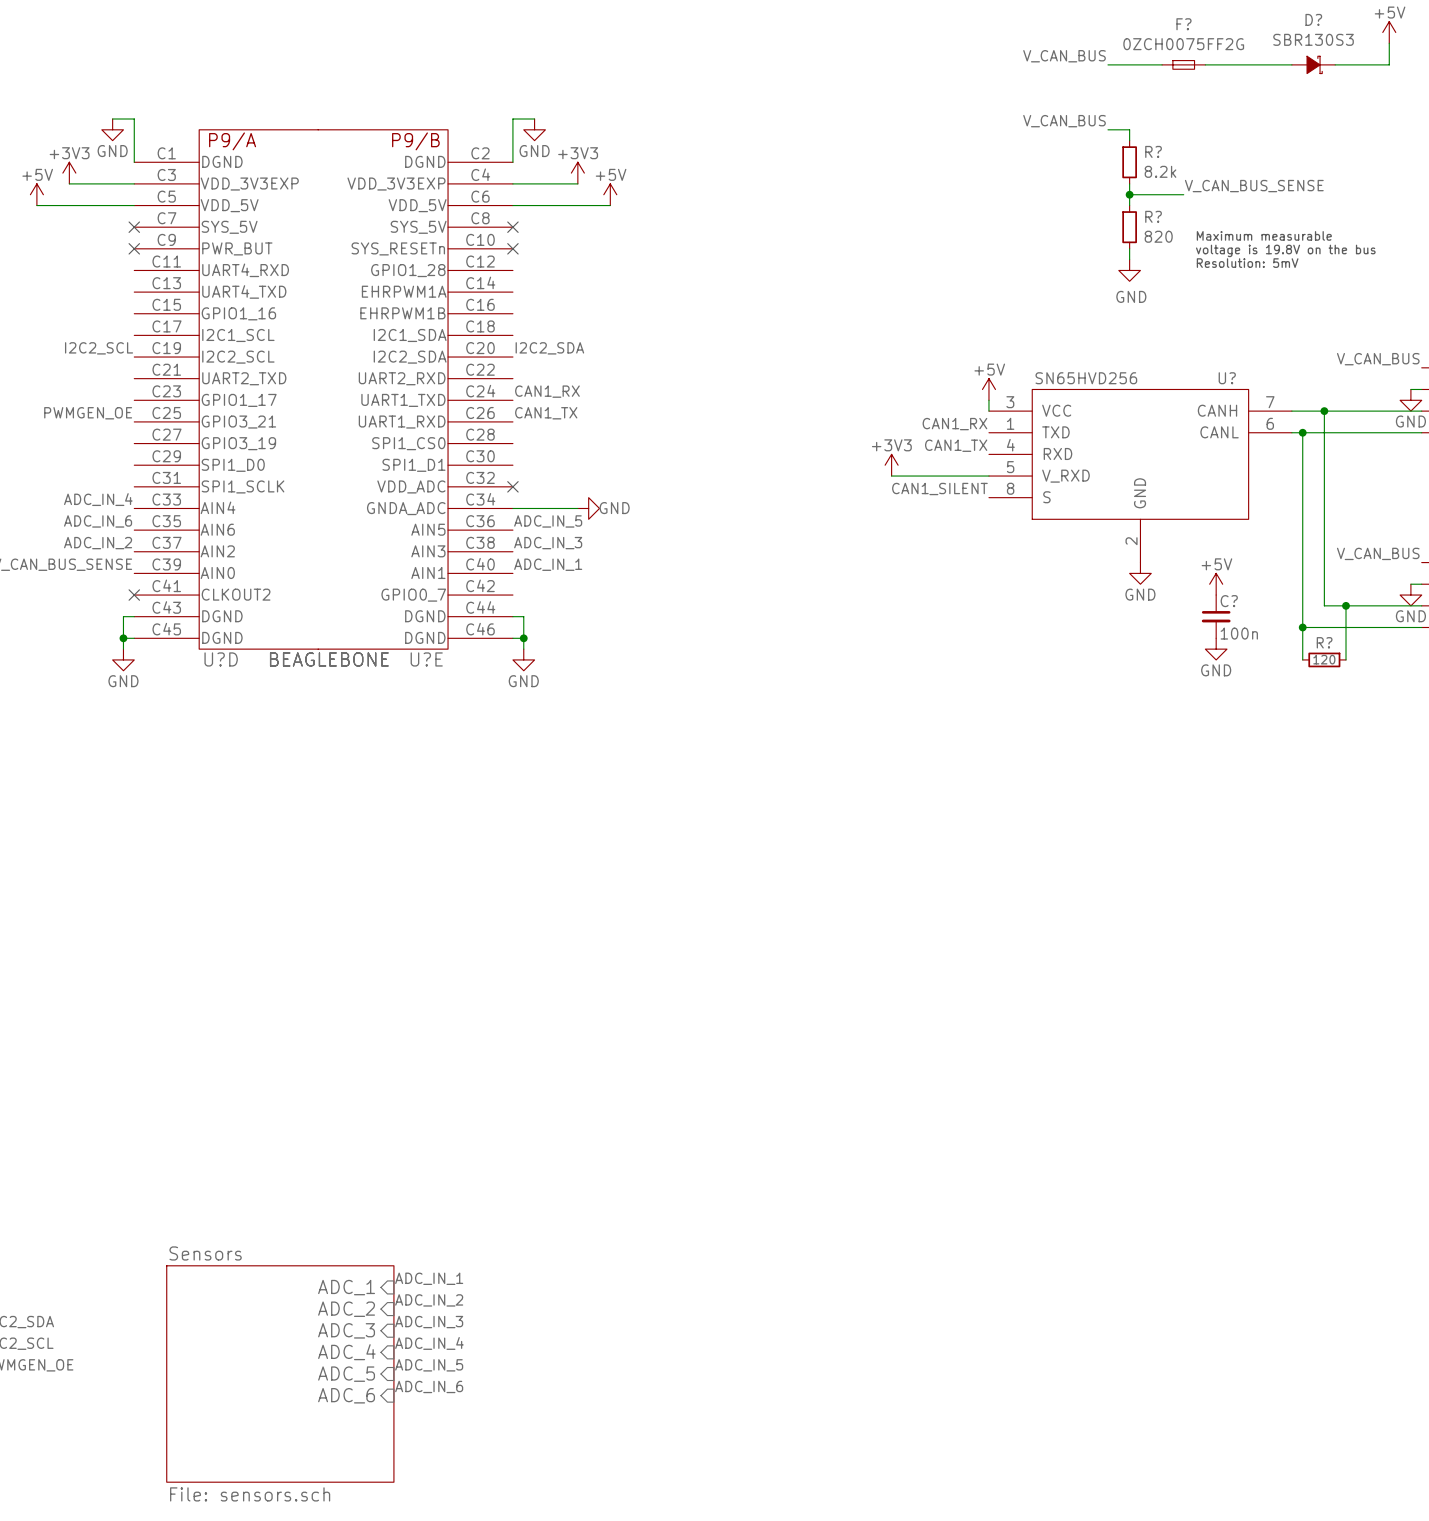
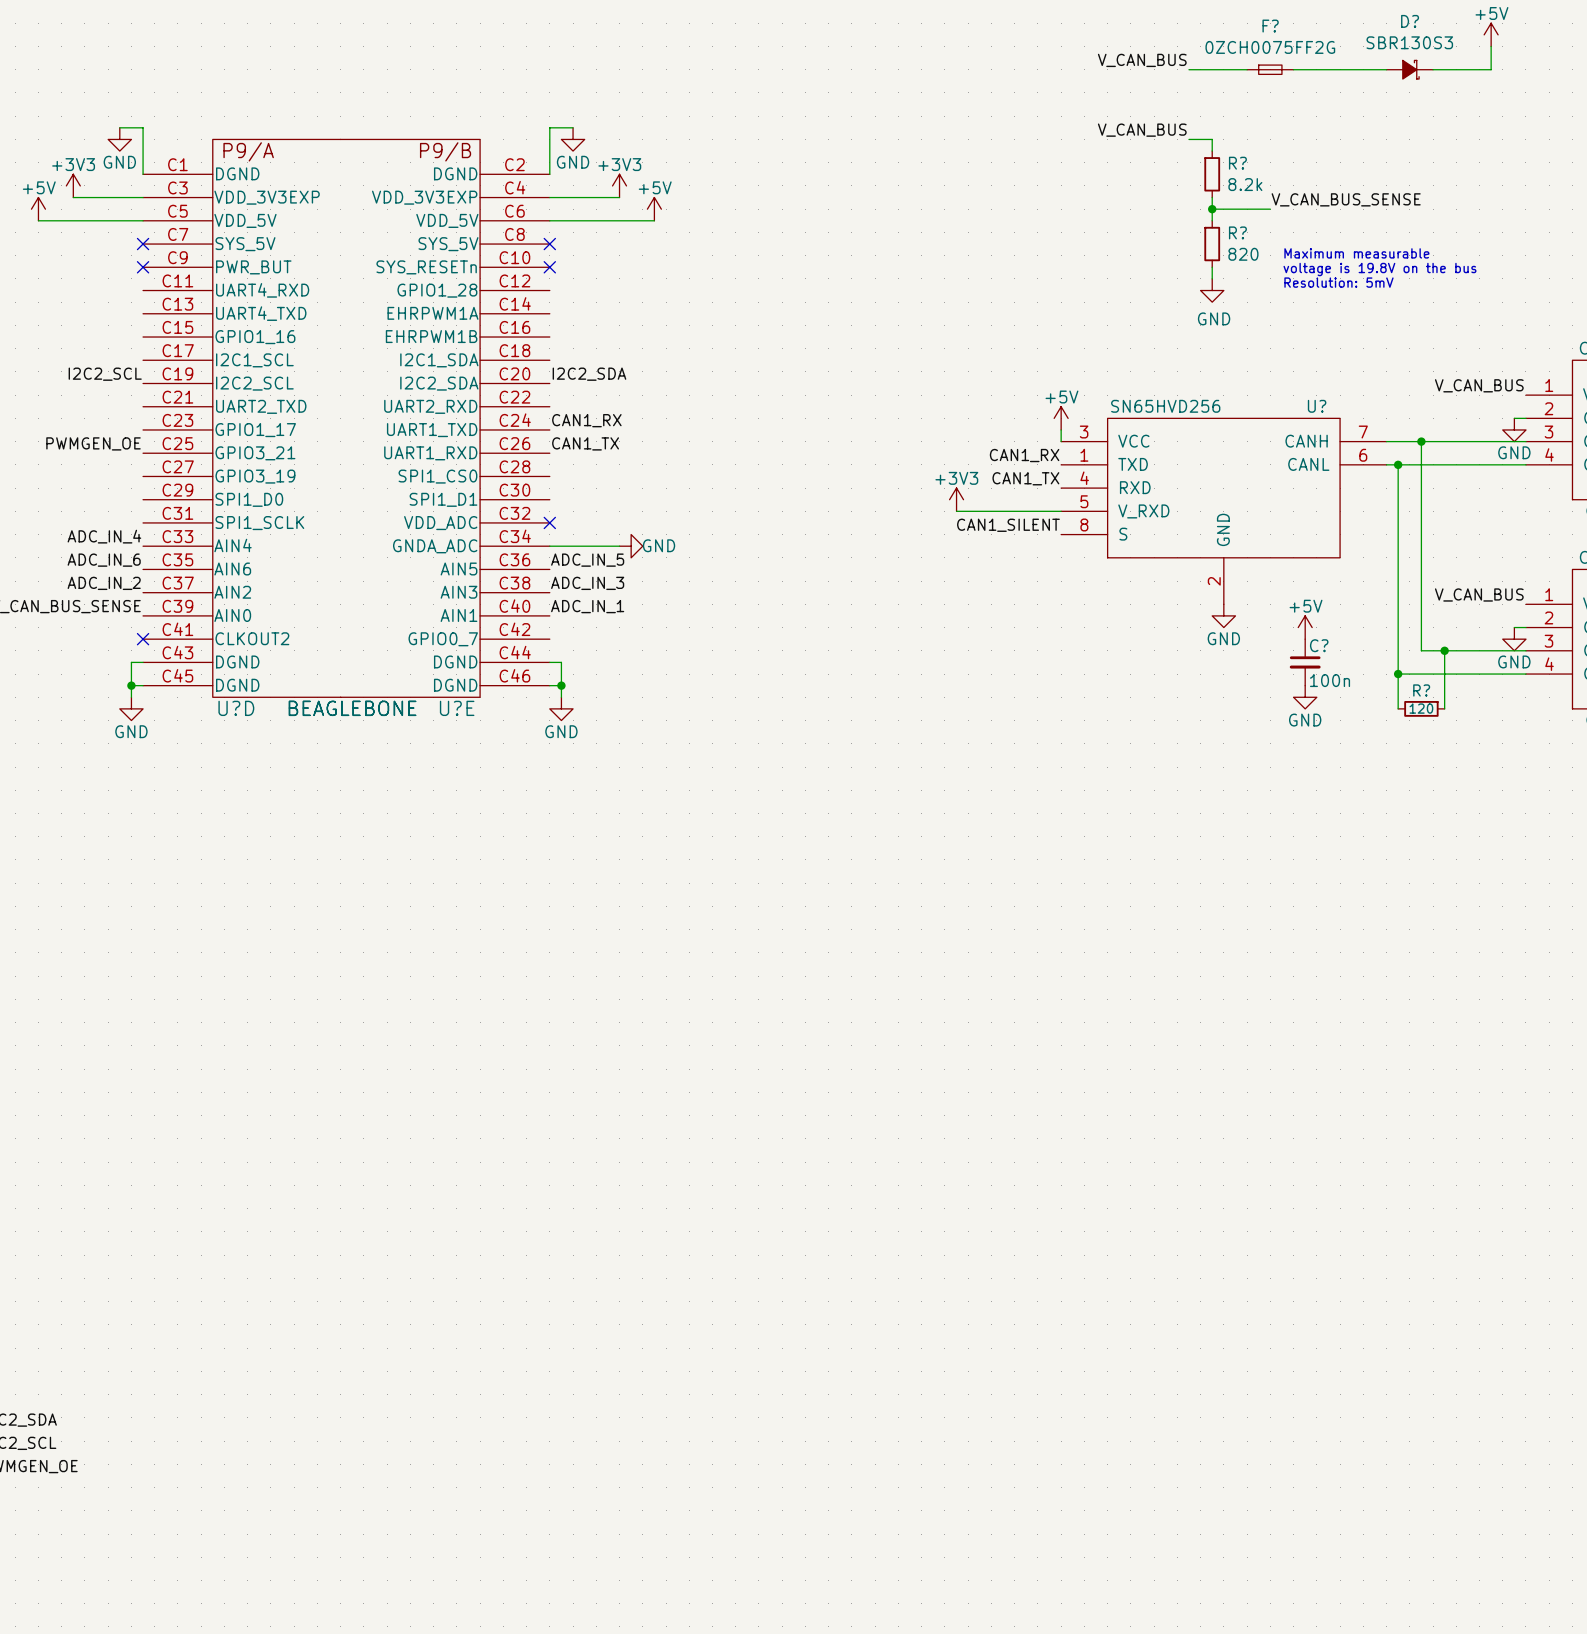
label: ADC_IN_1 (429, 1278) -> none
sheet pin: ADC_1 (346, 1287) -> none
label: ADC_IN_2 (429, 1300) -> none
sheet pin: ADC_2 (346, 1309) -> none
label: ADC_IN_3 (429, 1322) -> none
sheet pin: ADC_3 (346, 1330) -> none
label: ADC_IN_4 (429, 1343) -> none
sheet pin: ADC_4 (346, 1352) -> none
label: ADC_IN_5 (429, 1365) -> none
sheet Sensors: File: sensors.sch (280, 1374) -> none
sheet pin: ADC_5 (346, 1374) -> none
label: ADC_IN_6 (429, 1386) -> none
sheet pin: ADC_6 (346, 1395) -> none

